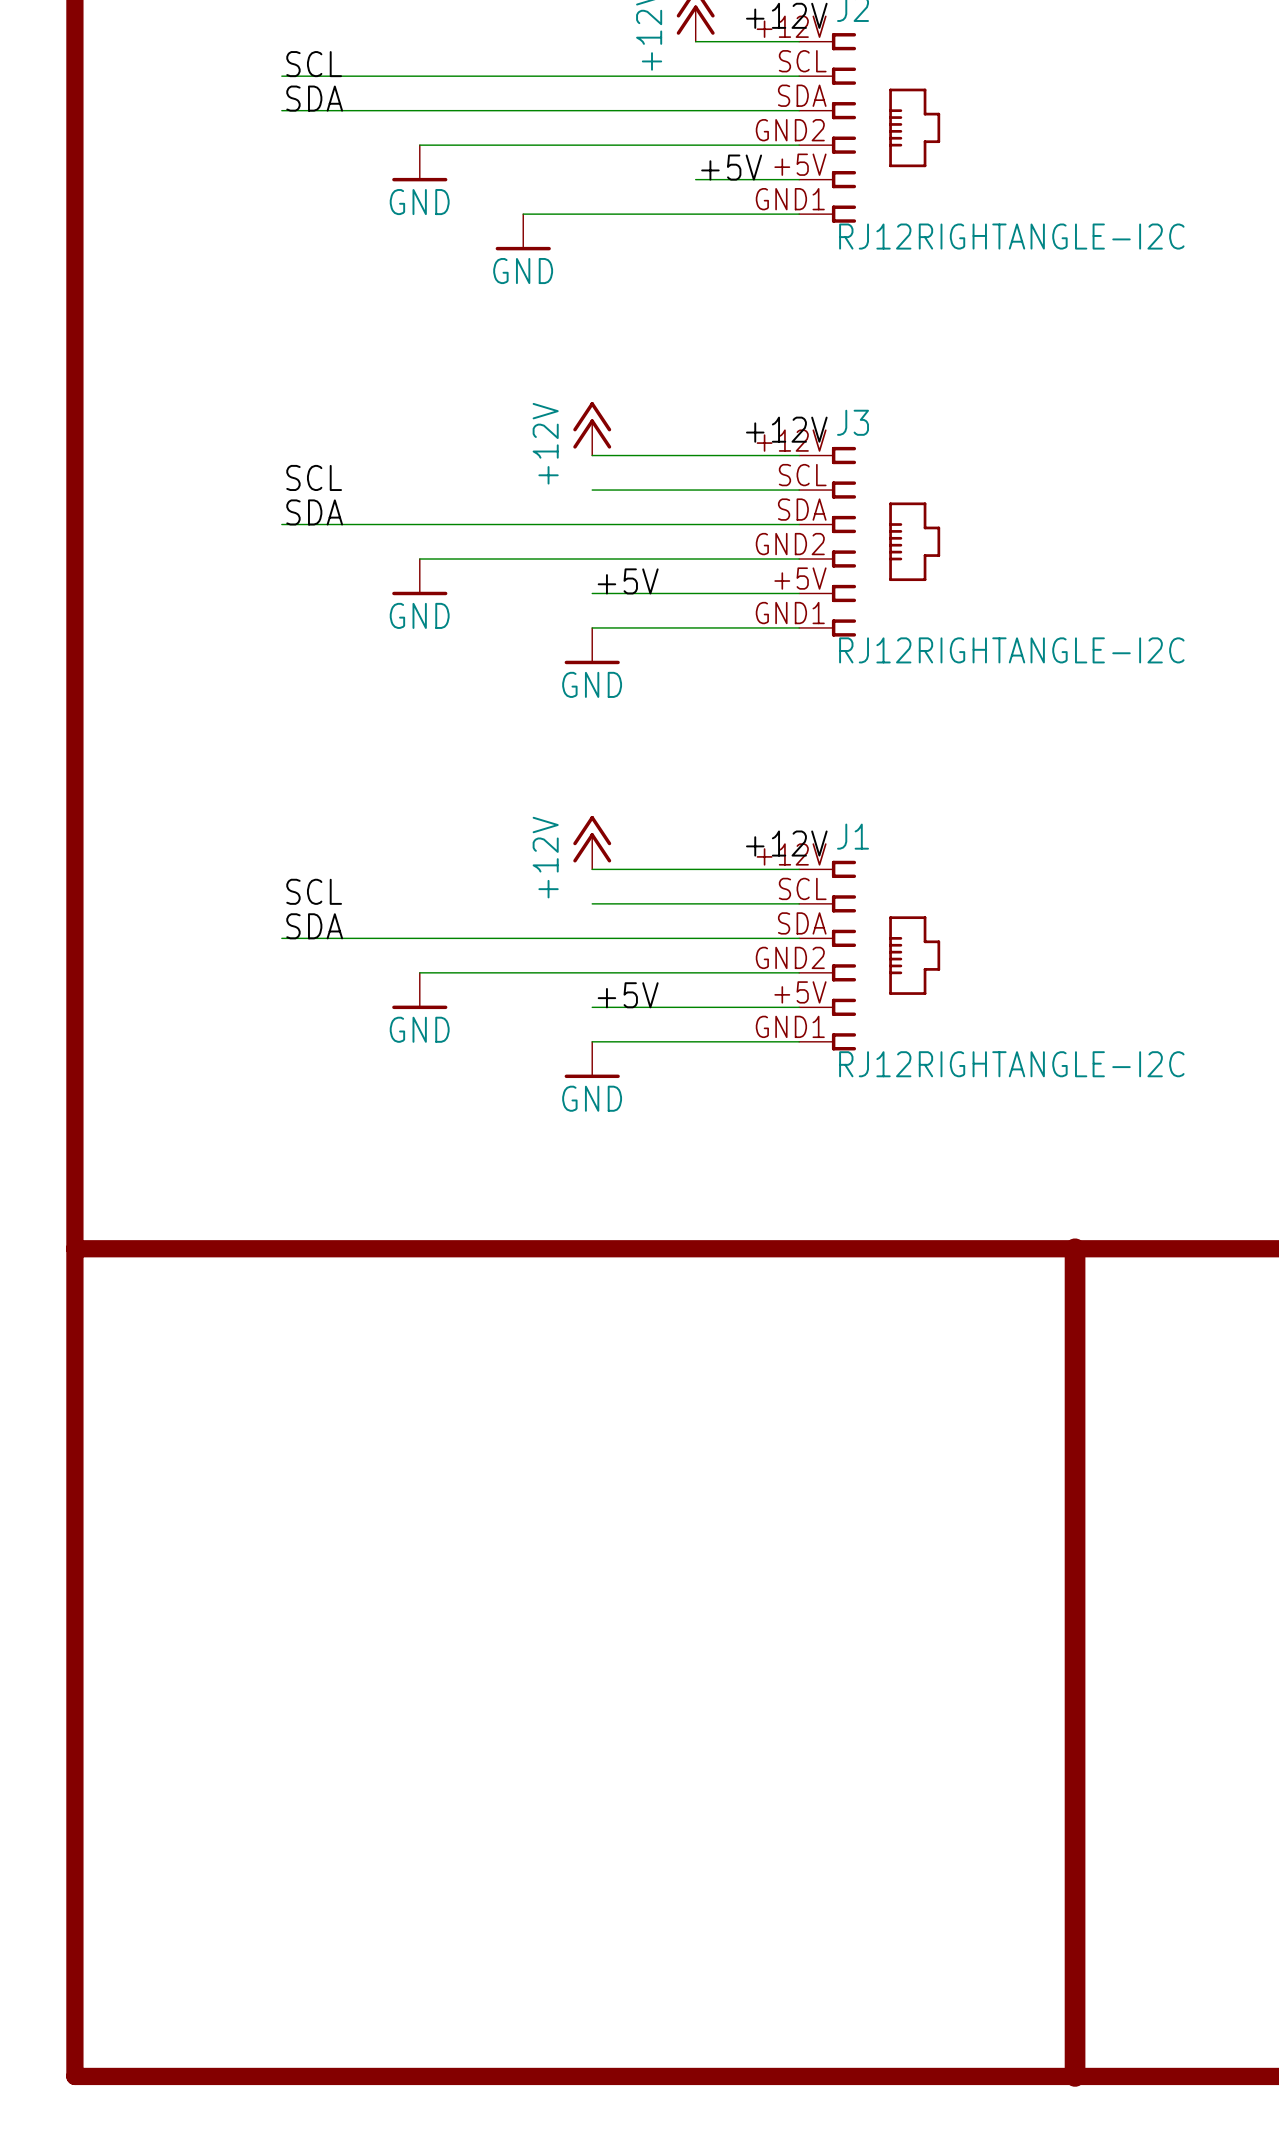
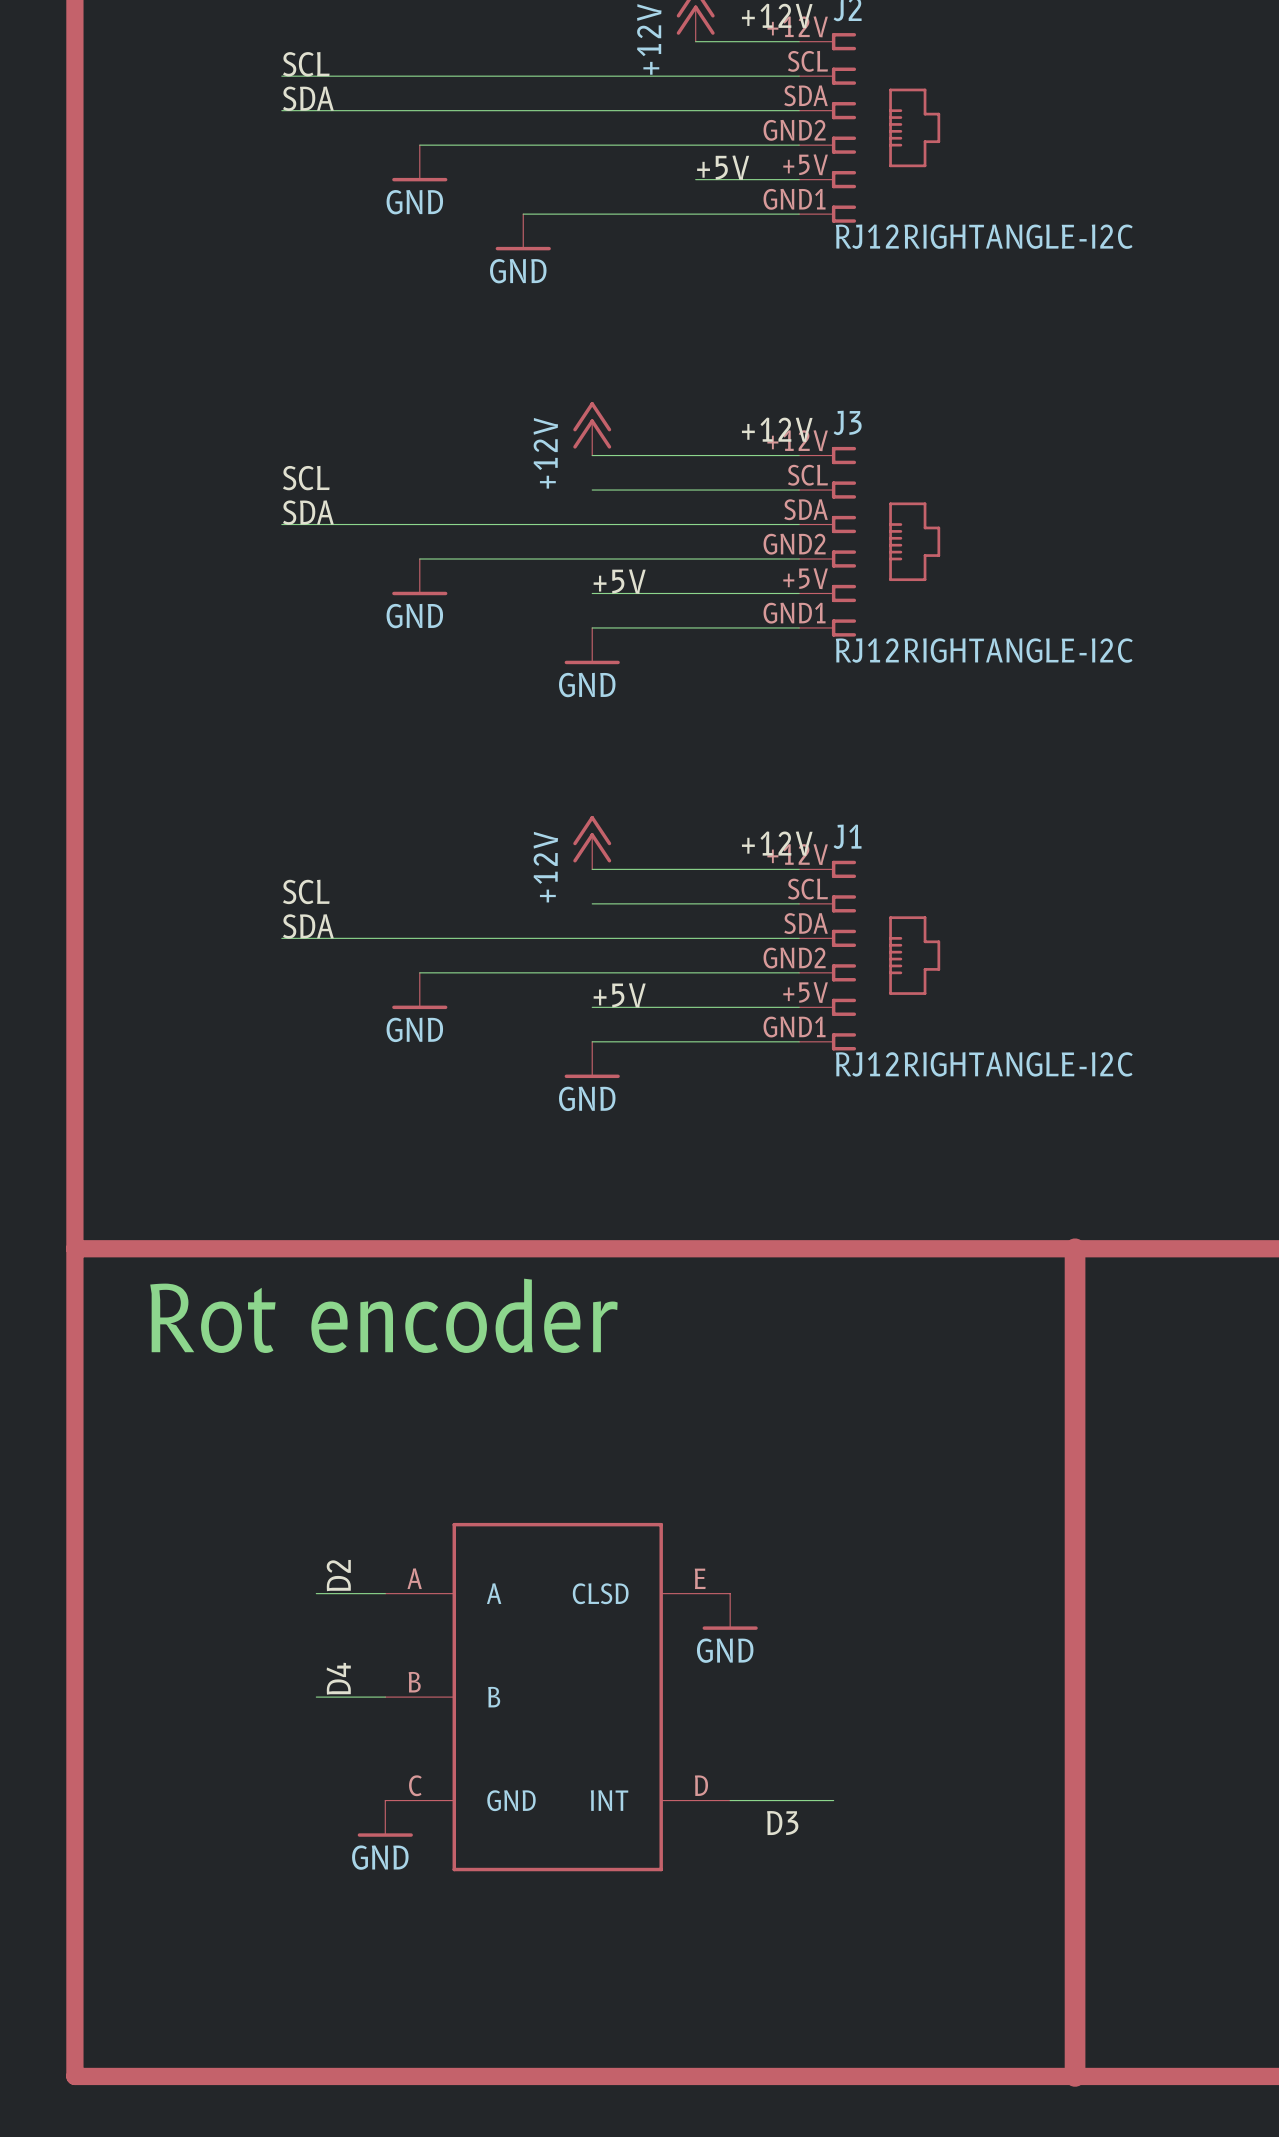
text: none -> Rot encoder (383, 1315)
label: none -> D2 (338, 1575)
wire: none -> (316, 1593) (385, 1593)
power symbol: none -> GND (730, 1611)
label: none -> D4 (338, 1678)
wire: none -> (316, 1697) (385, 1697)
part: none -> (557, 1697)
wire: none -> (730, 1800) (833, 1800)
power symbol: none -> GND (385, 1818)
label: none -> D3 (782, 1823)

